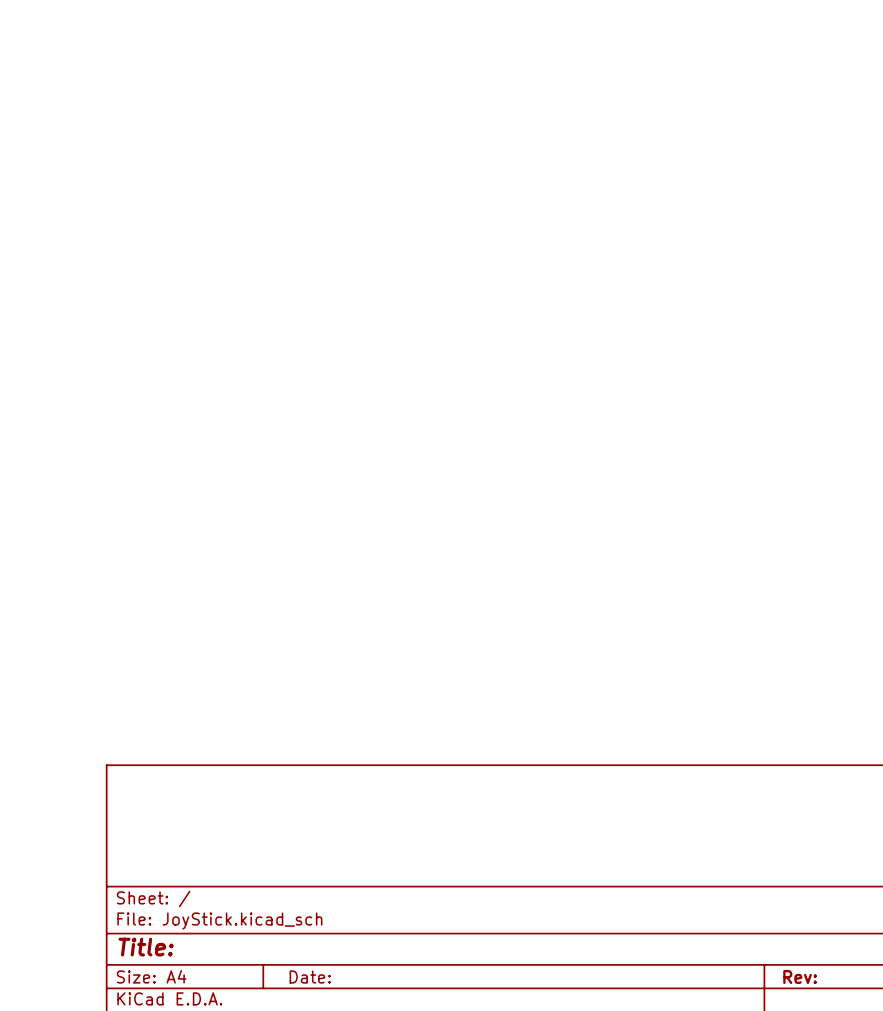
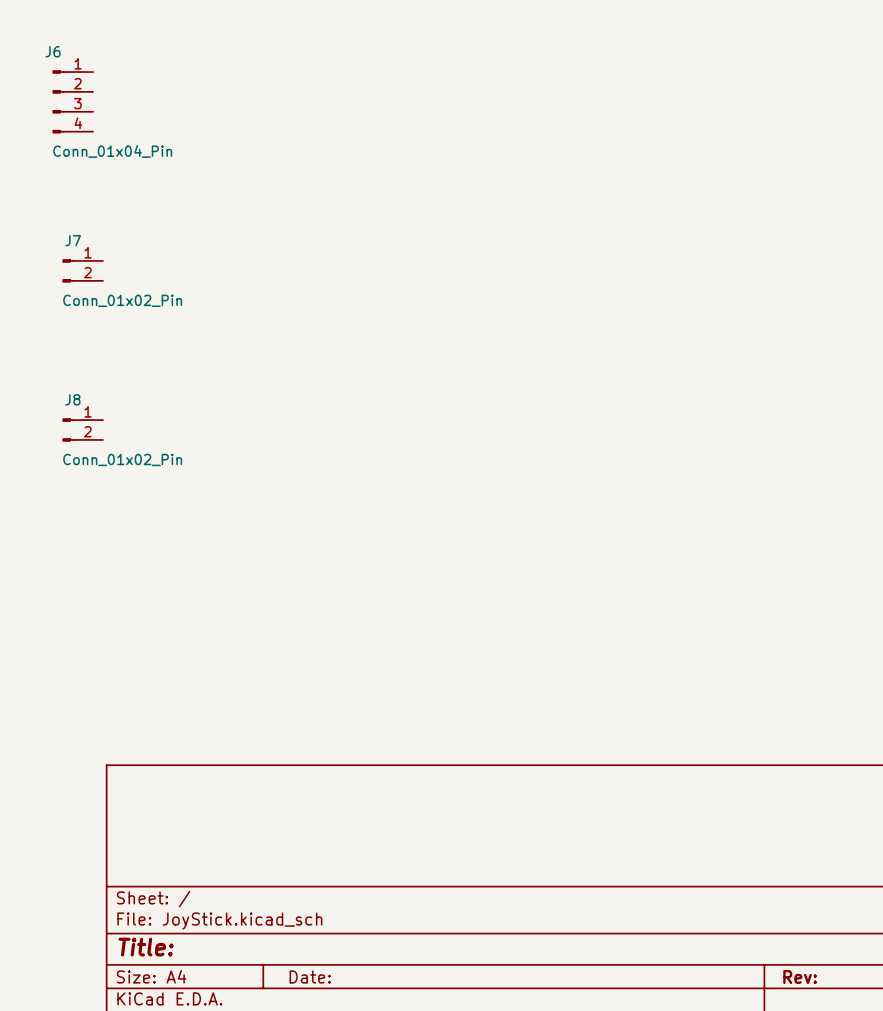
J6: none -> Conn_01x04_Pin (72, 101)
J7: none -> Conn_01x02_Pin (82, 270)
J8: none -> Conn_01x02_Pin (82, 430)

